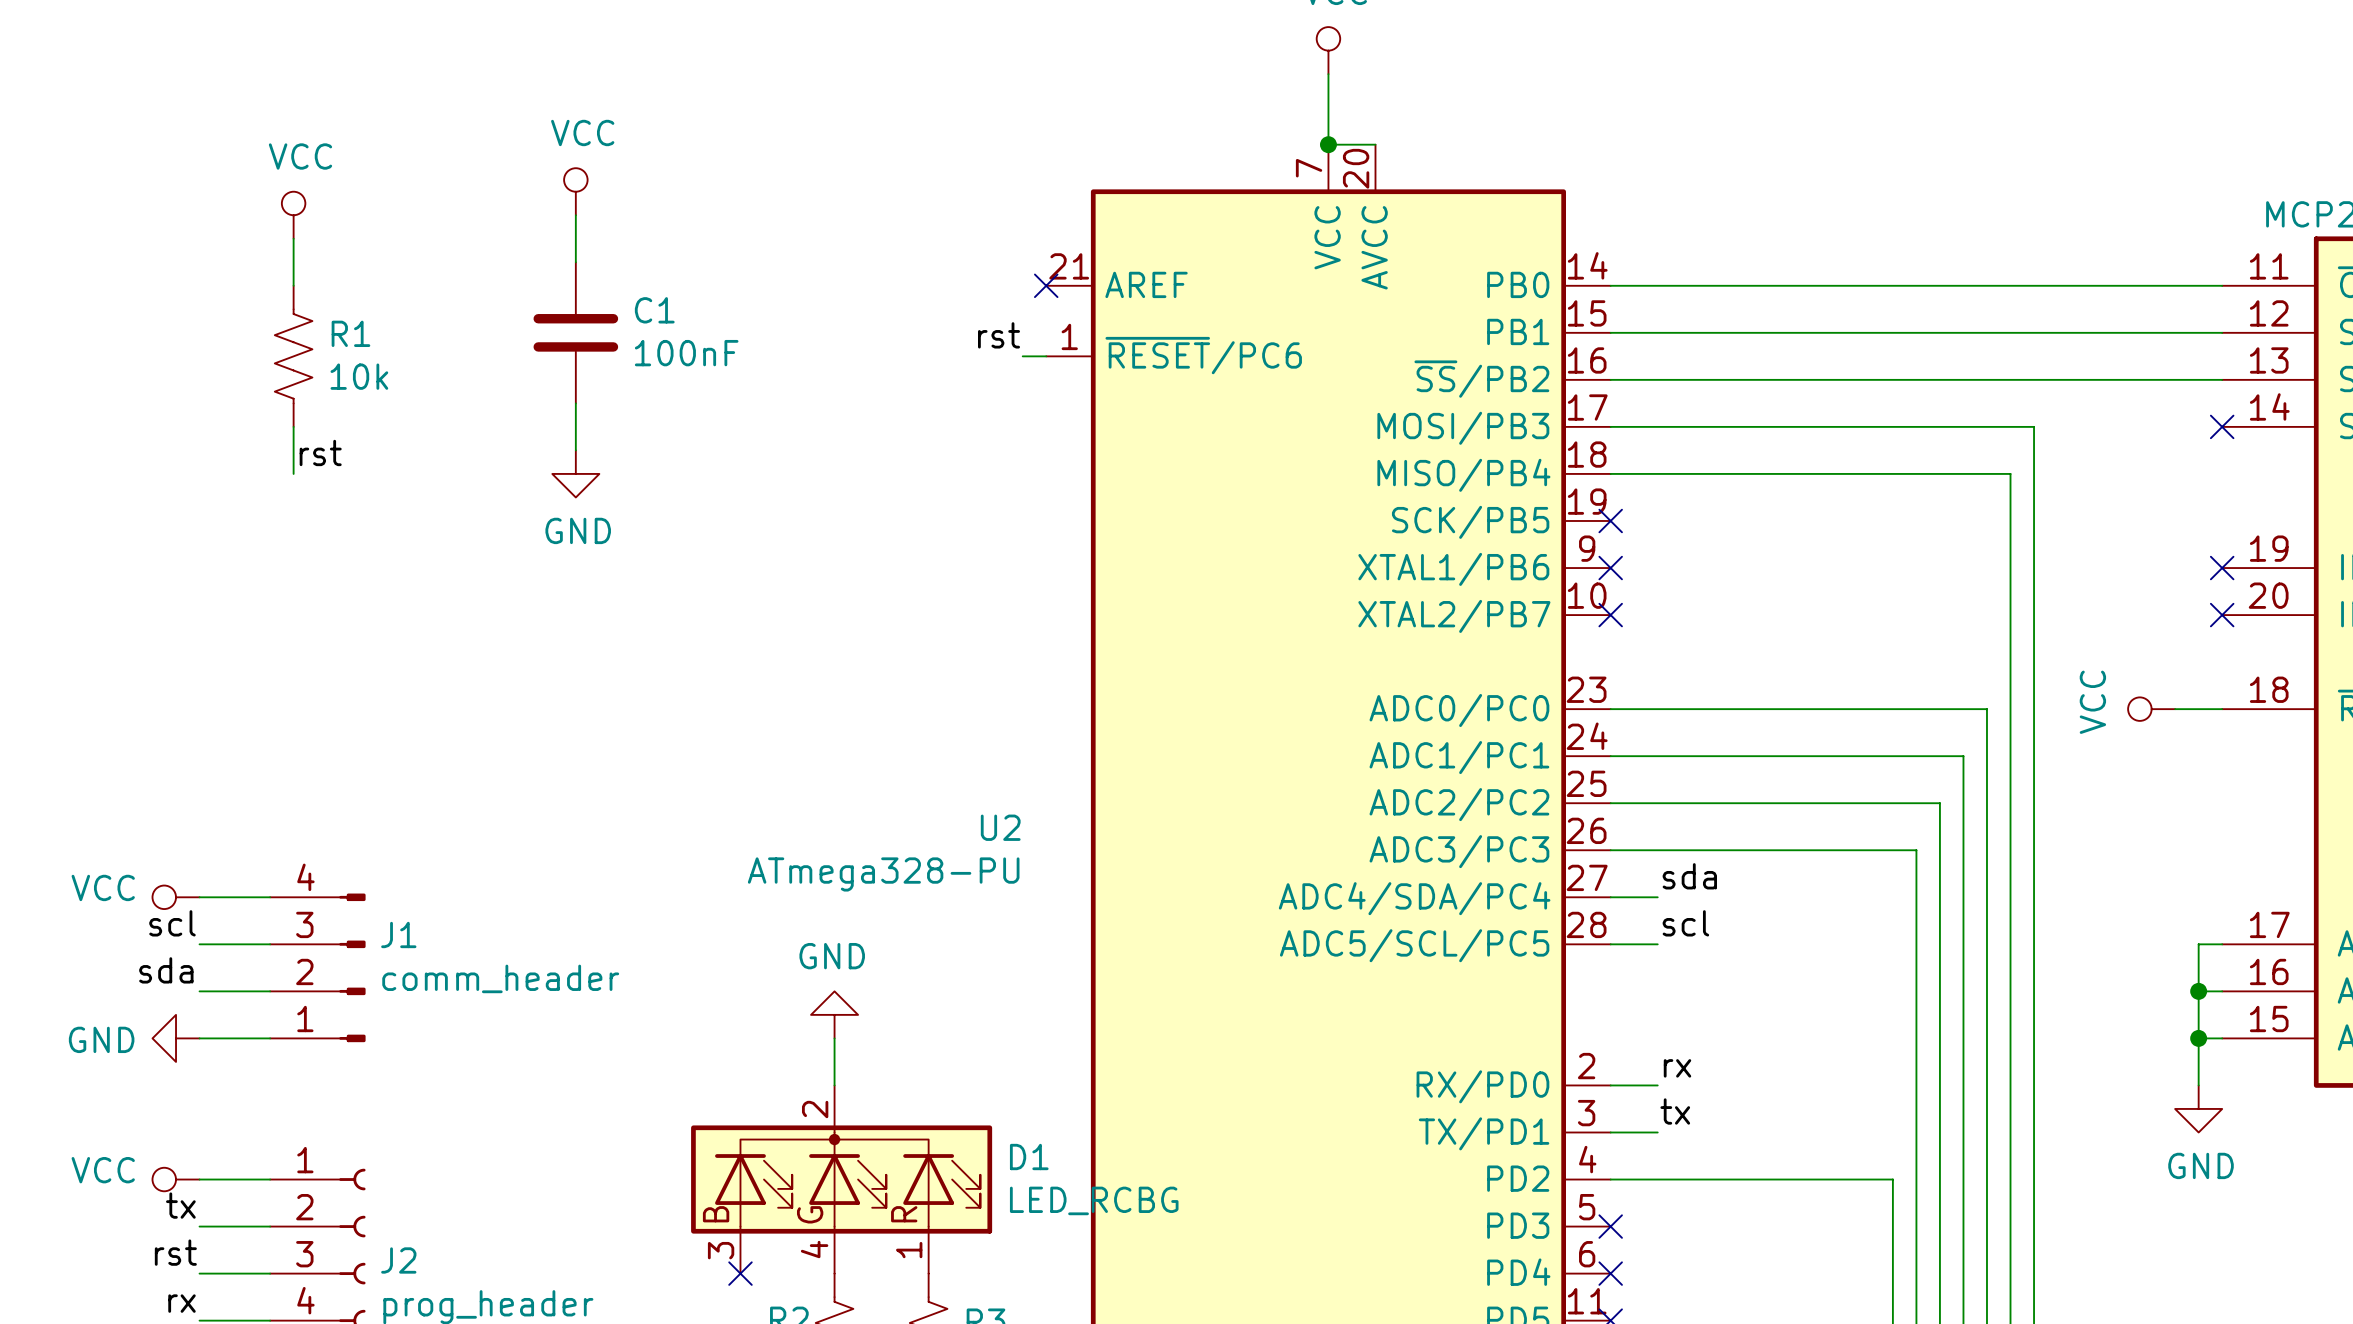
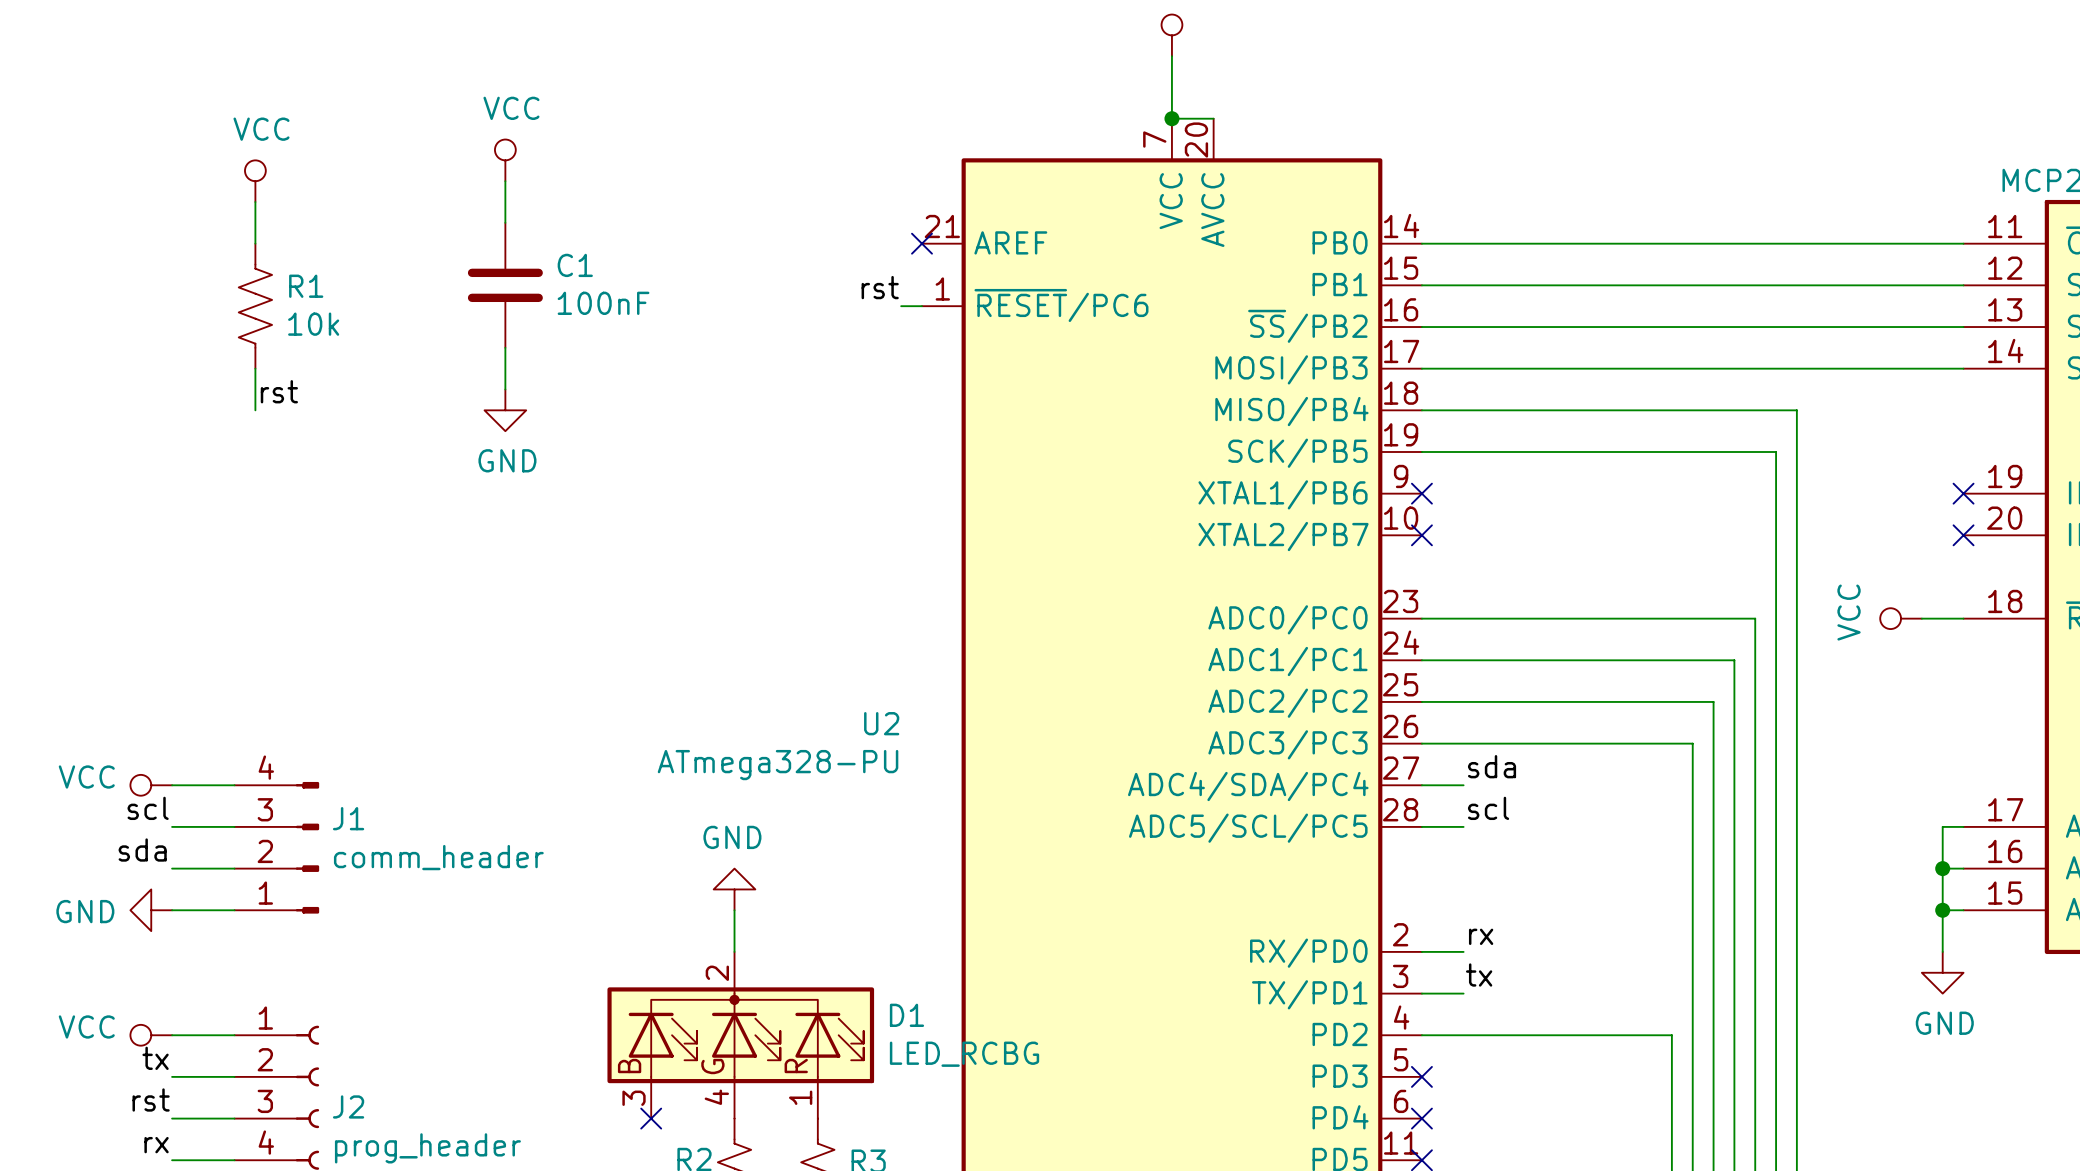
wire: (2034, 426) (2034, 473) -> (1776, 410) (1796, 410)
wire: none -> (1796, 368) (1963, 368)
no-connect mark: (2222, 426) -> none
wire: (2010, 473) (2010, 520) -> (1421, 451) (1776, 451)
no-connect mark: (1610, 520) -> none

